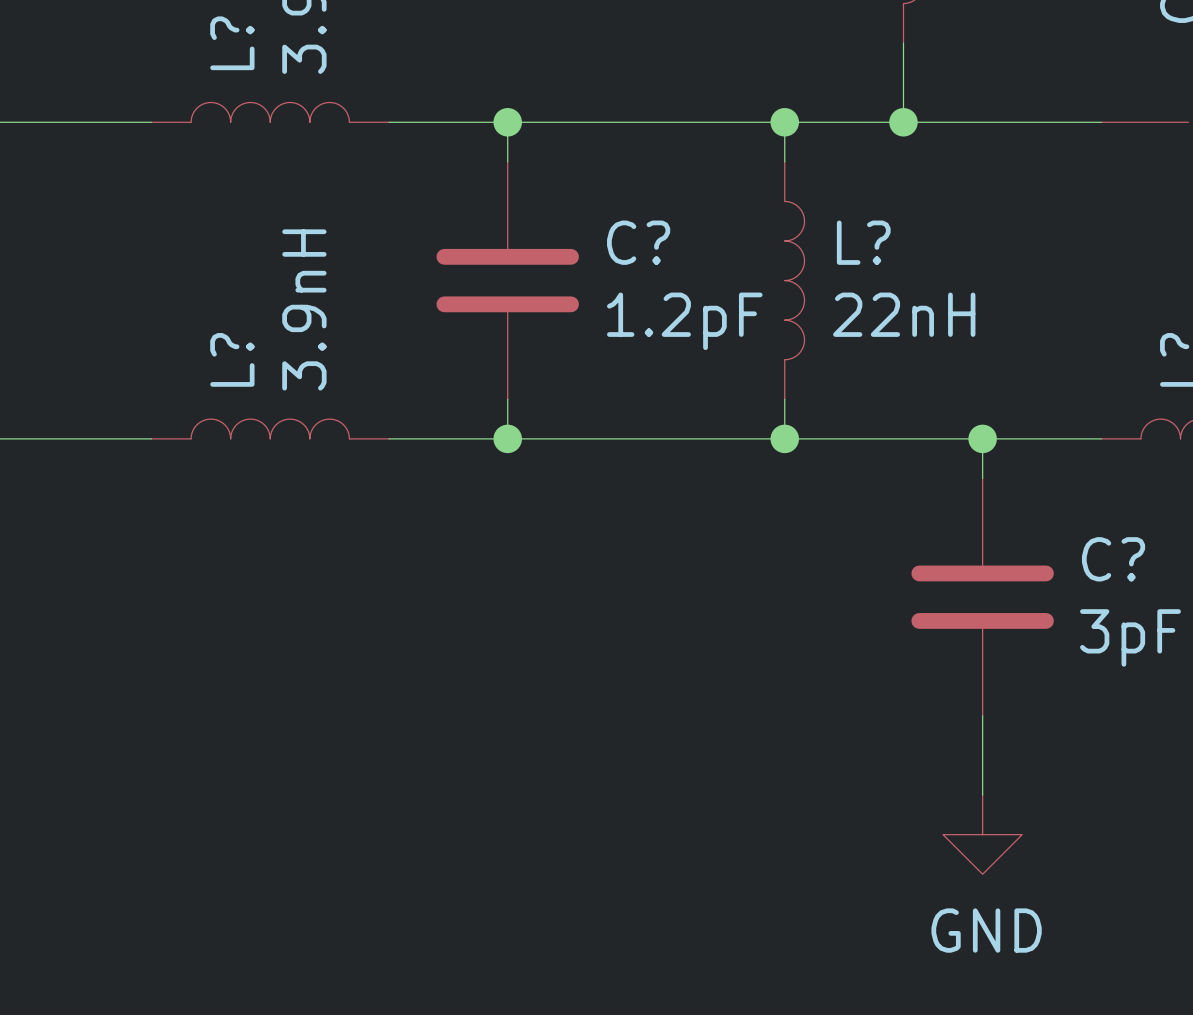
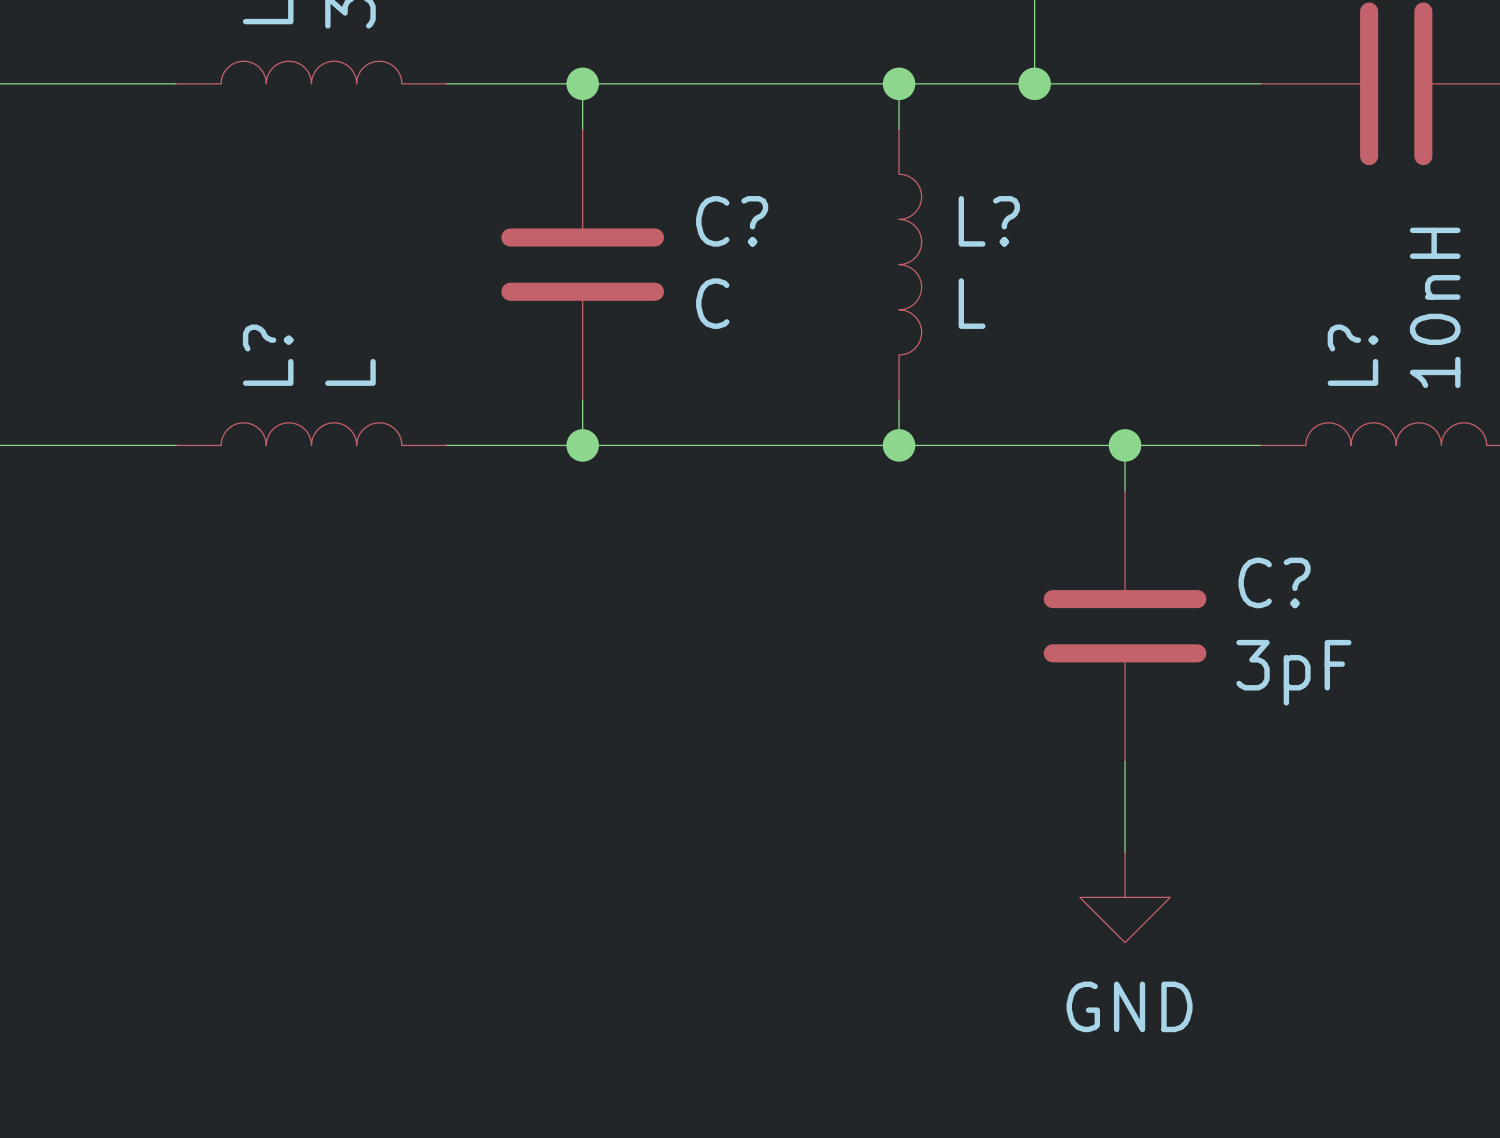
L? value: 3.9nH (304, 309) -> L (350, 372)
L? value: 22nH (904, 314) -> L (972, 303)
C? value: 1.2pF (684, 321) -> C (712, 303)

